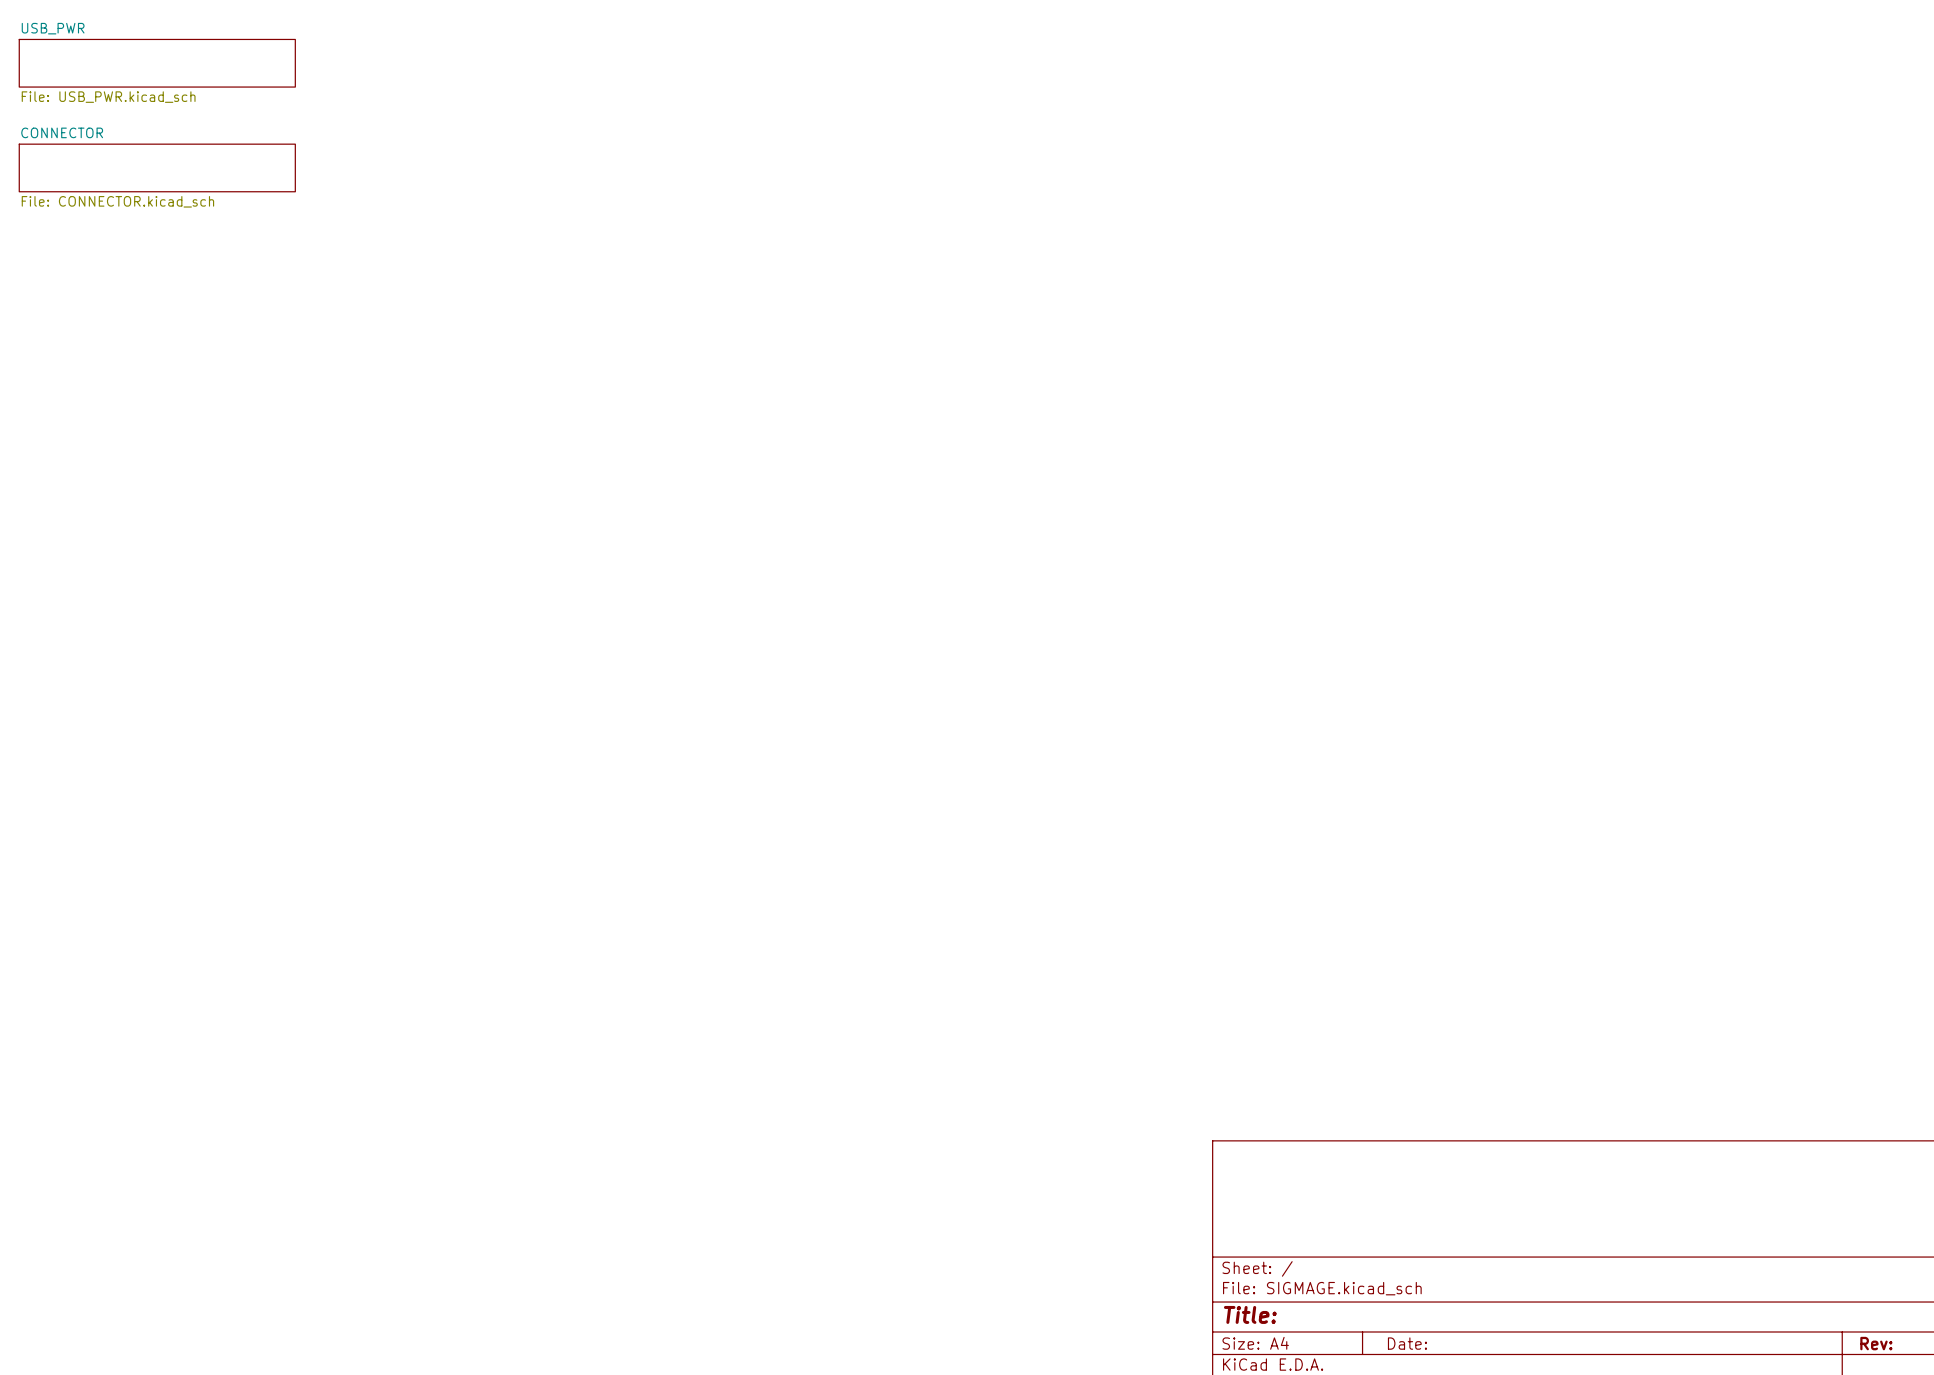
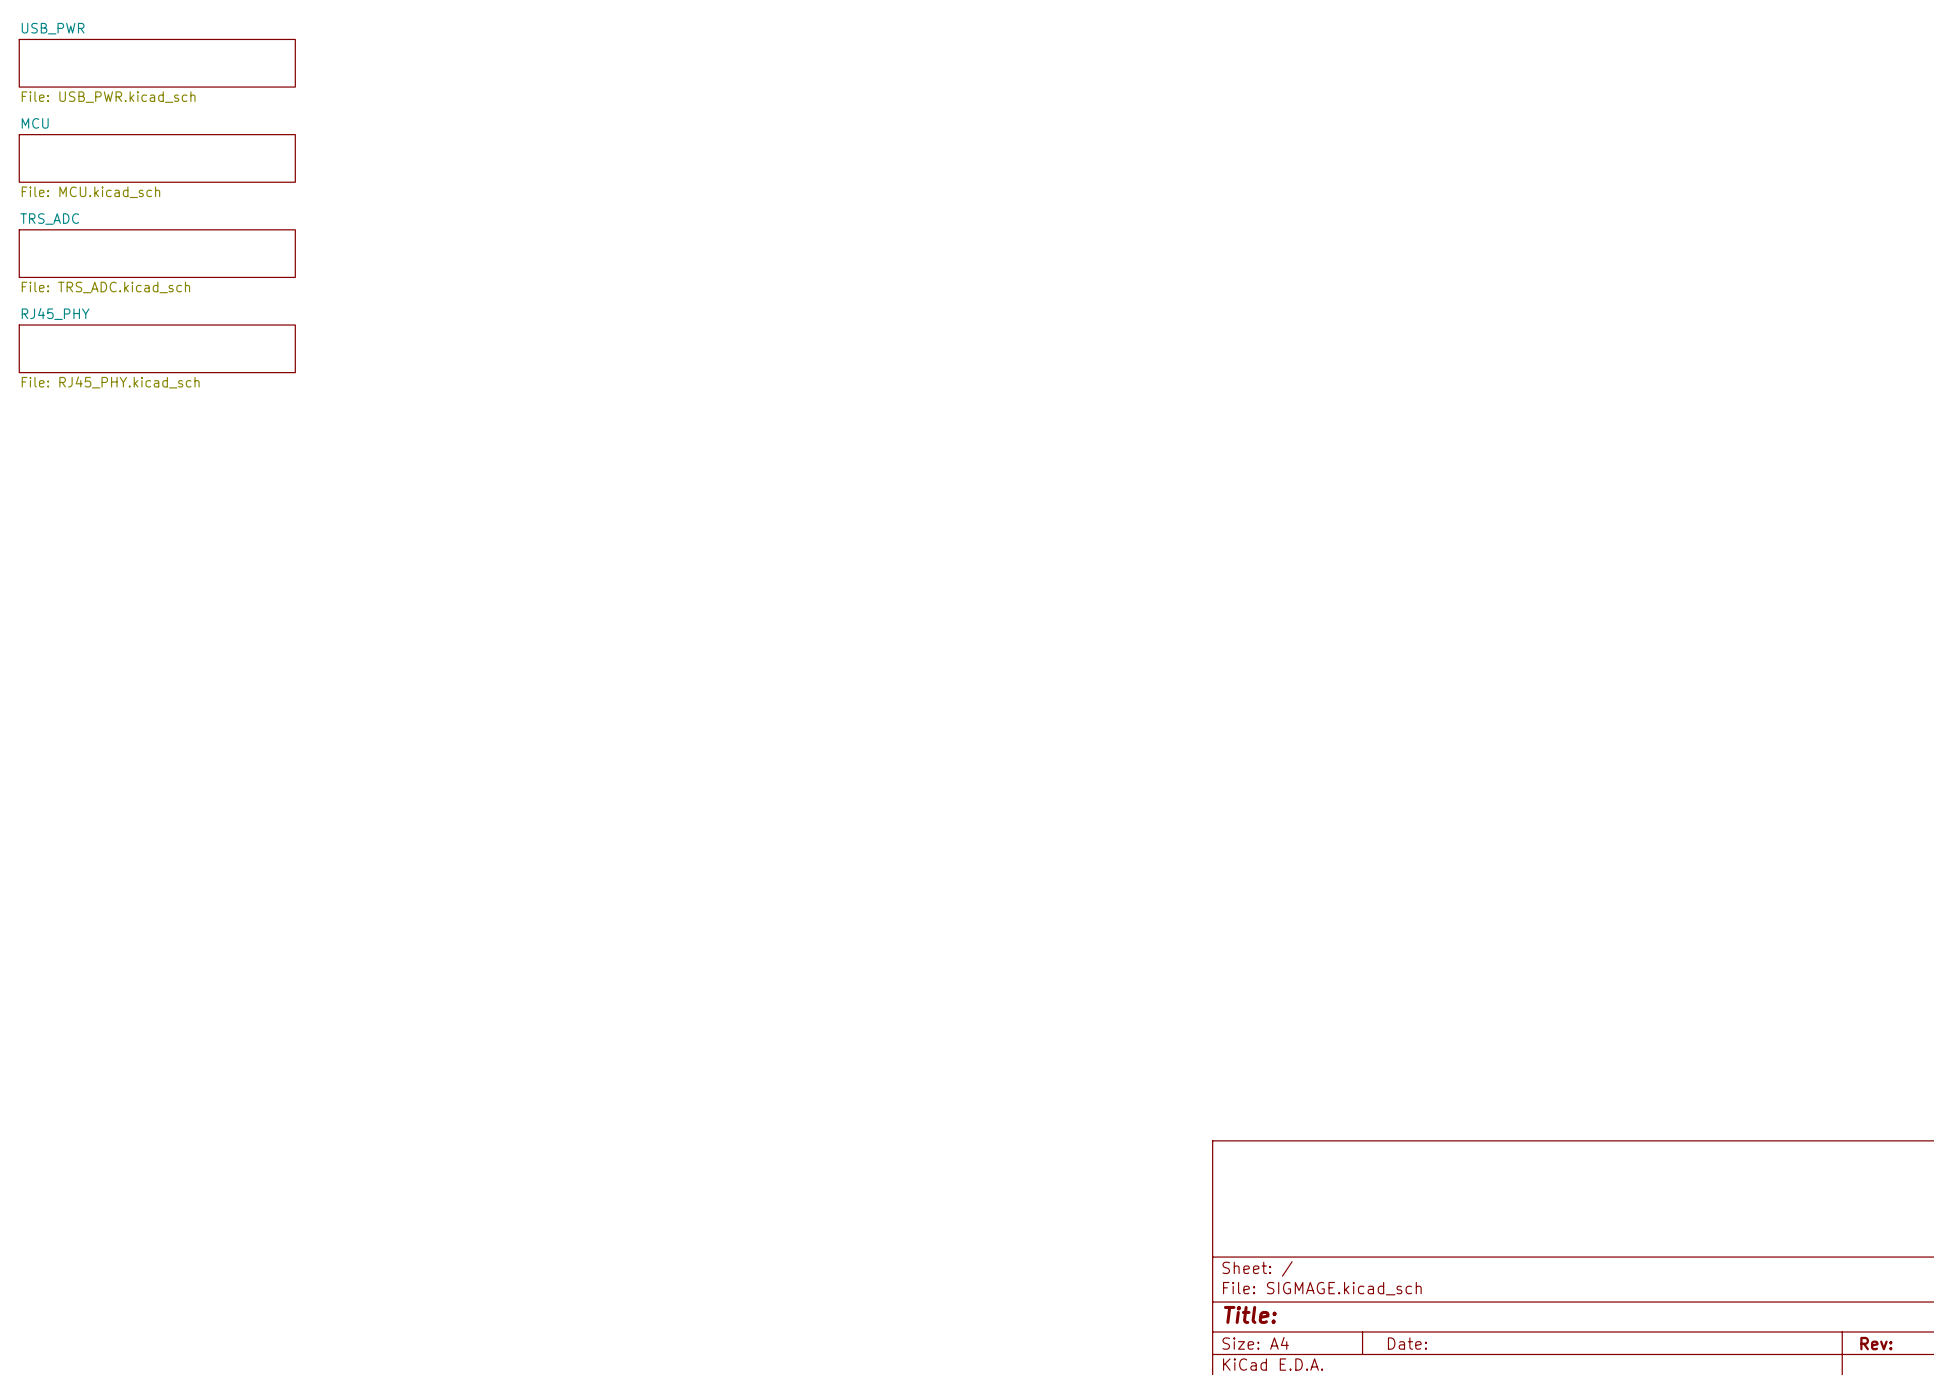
sheet MCU: none -> File: MCU.kicad_sch (157, 158)
sheet CONNECTOR: File: CONNECTOR.kicad_sch (157, 167) -> none
sheet TRS_ADC: none -> File: TRS_ADC.kicad_sch (157, 253)
sheet RJ45_PHY: none -> File: RJ45_PHY.kicad_sch (157, 348)

